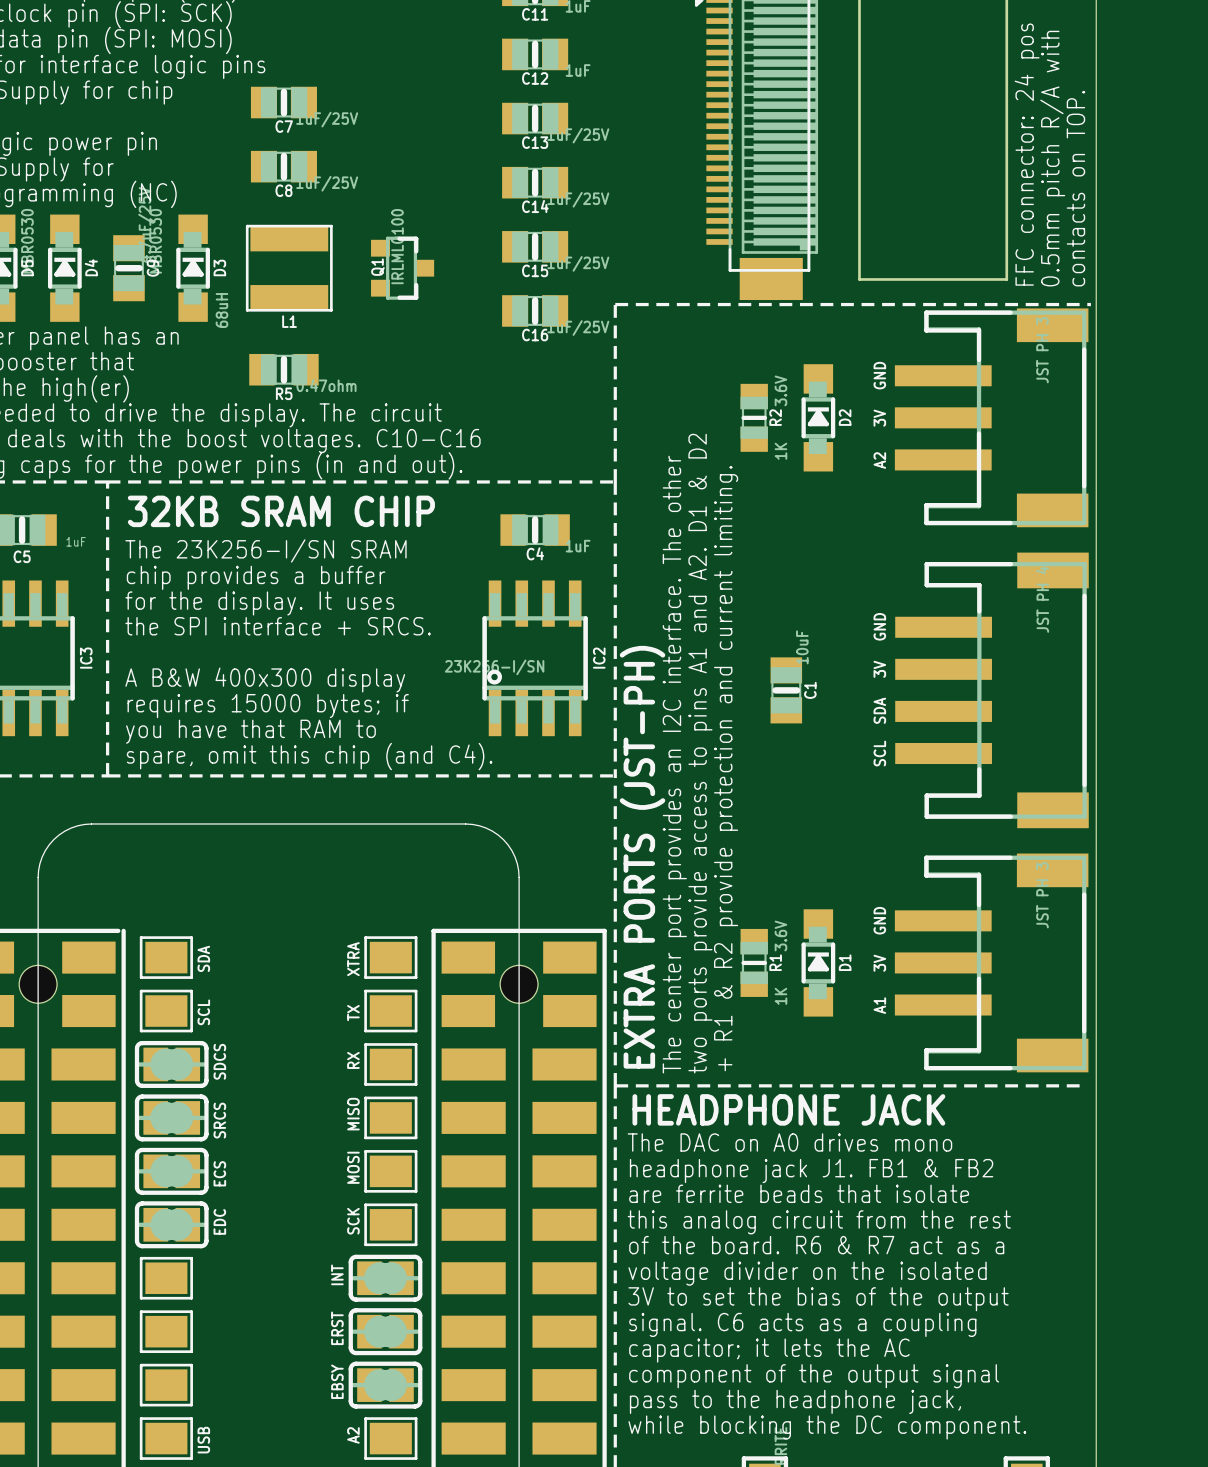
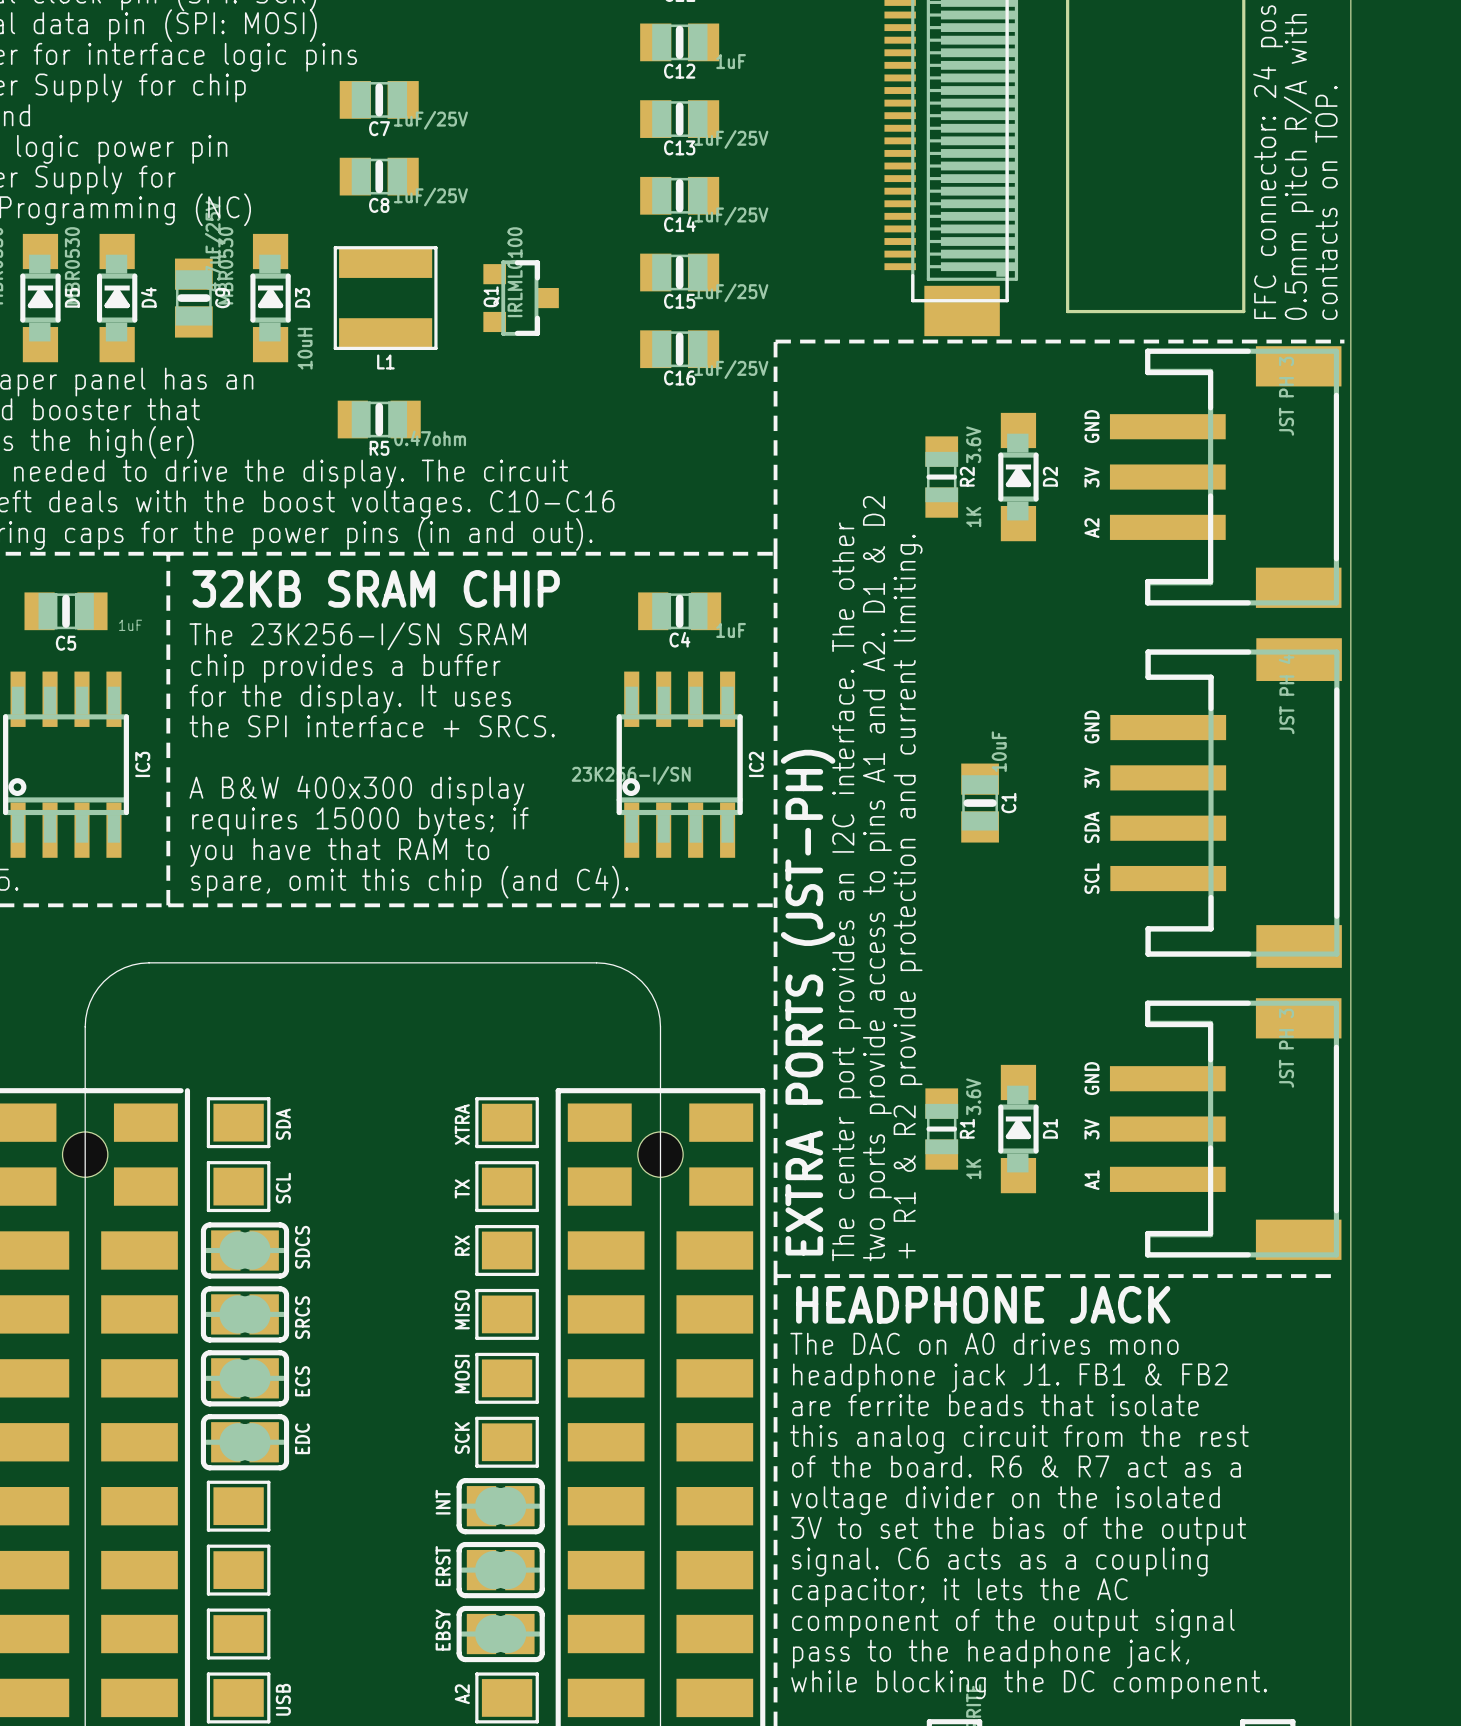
L1 value: 68uH (221, 310) -> 10uH (305, 348)

